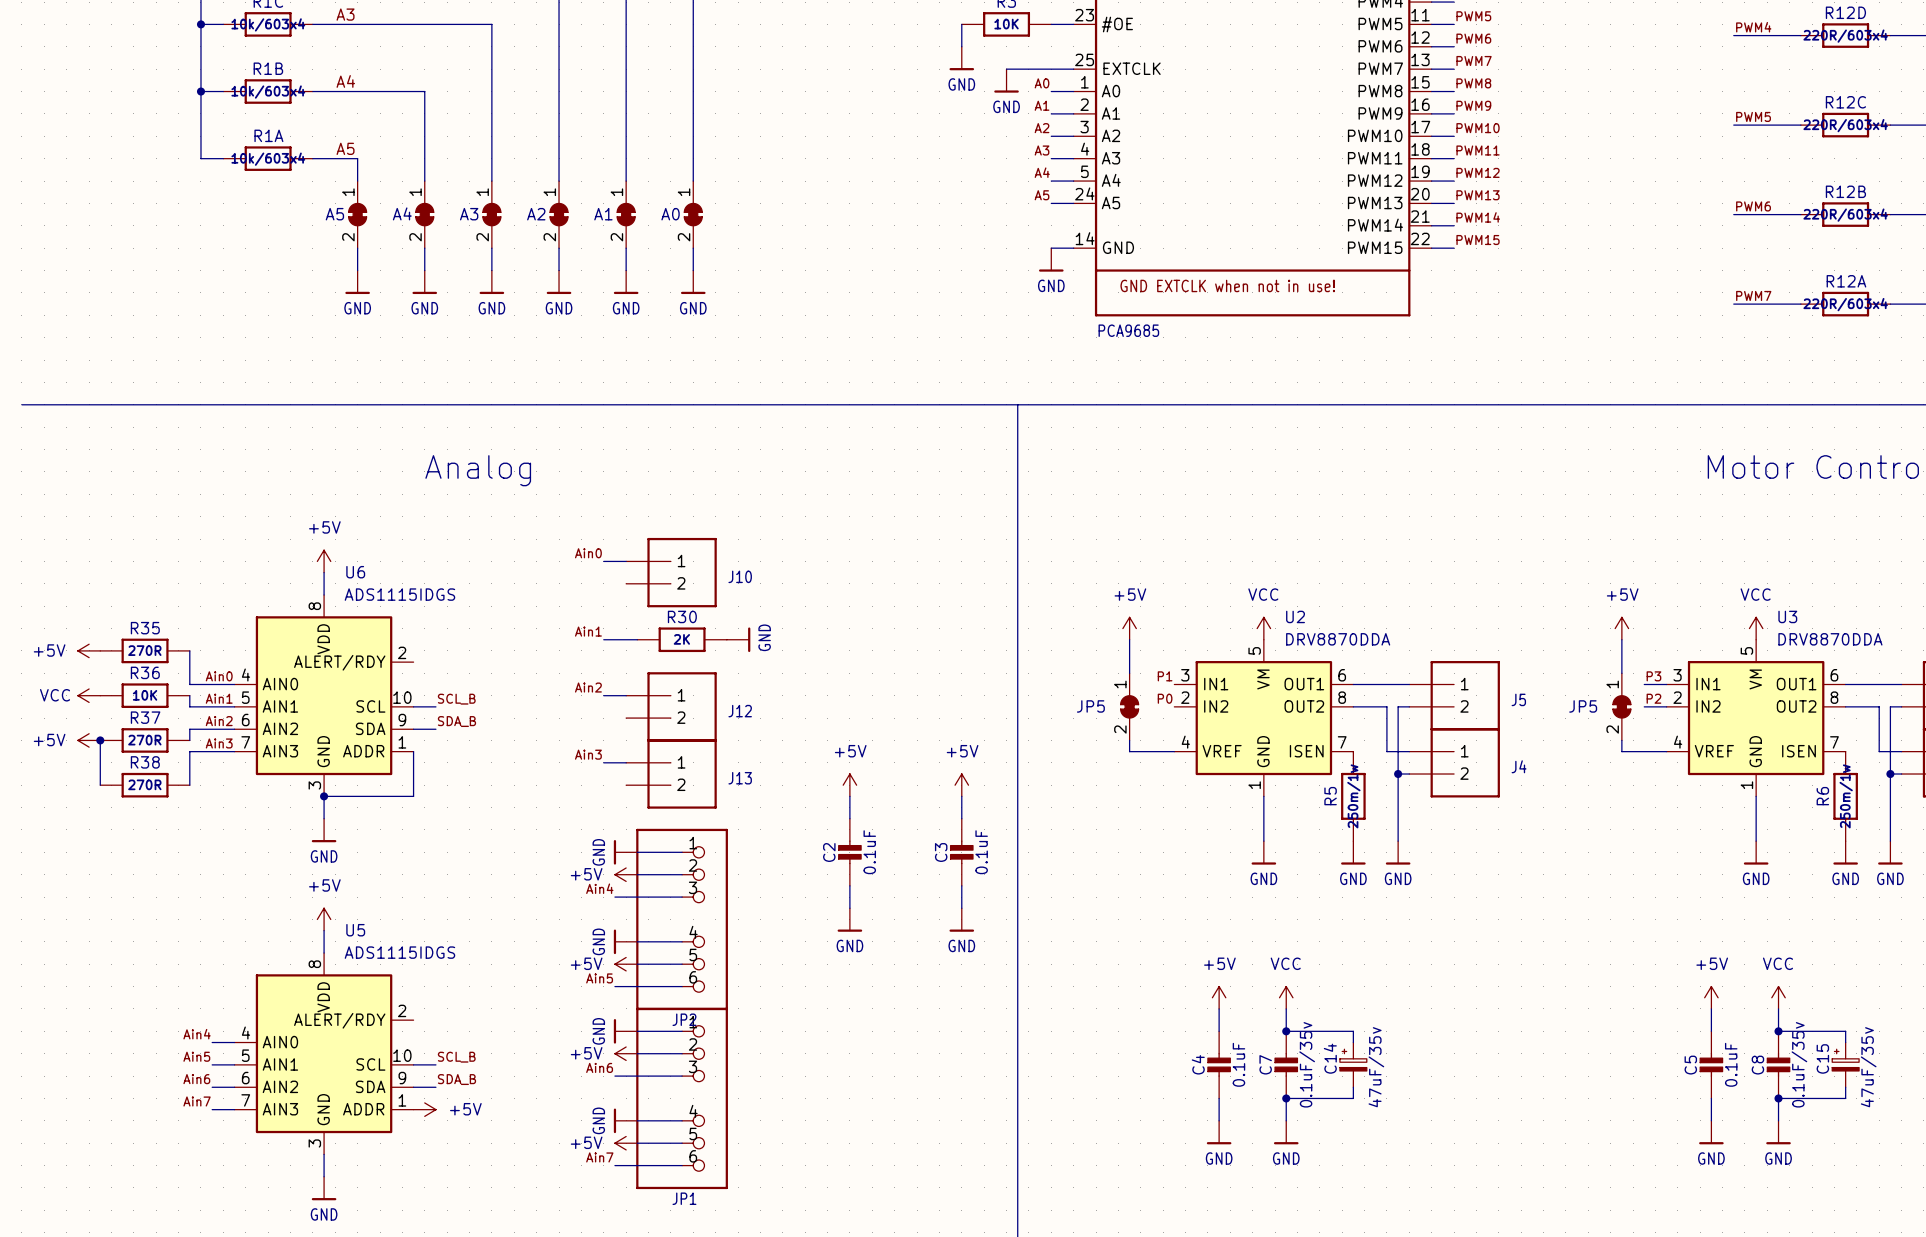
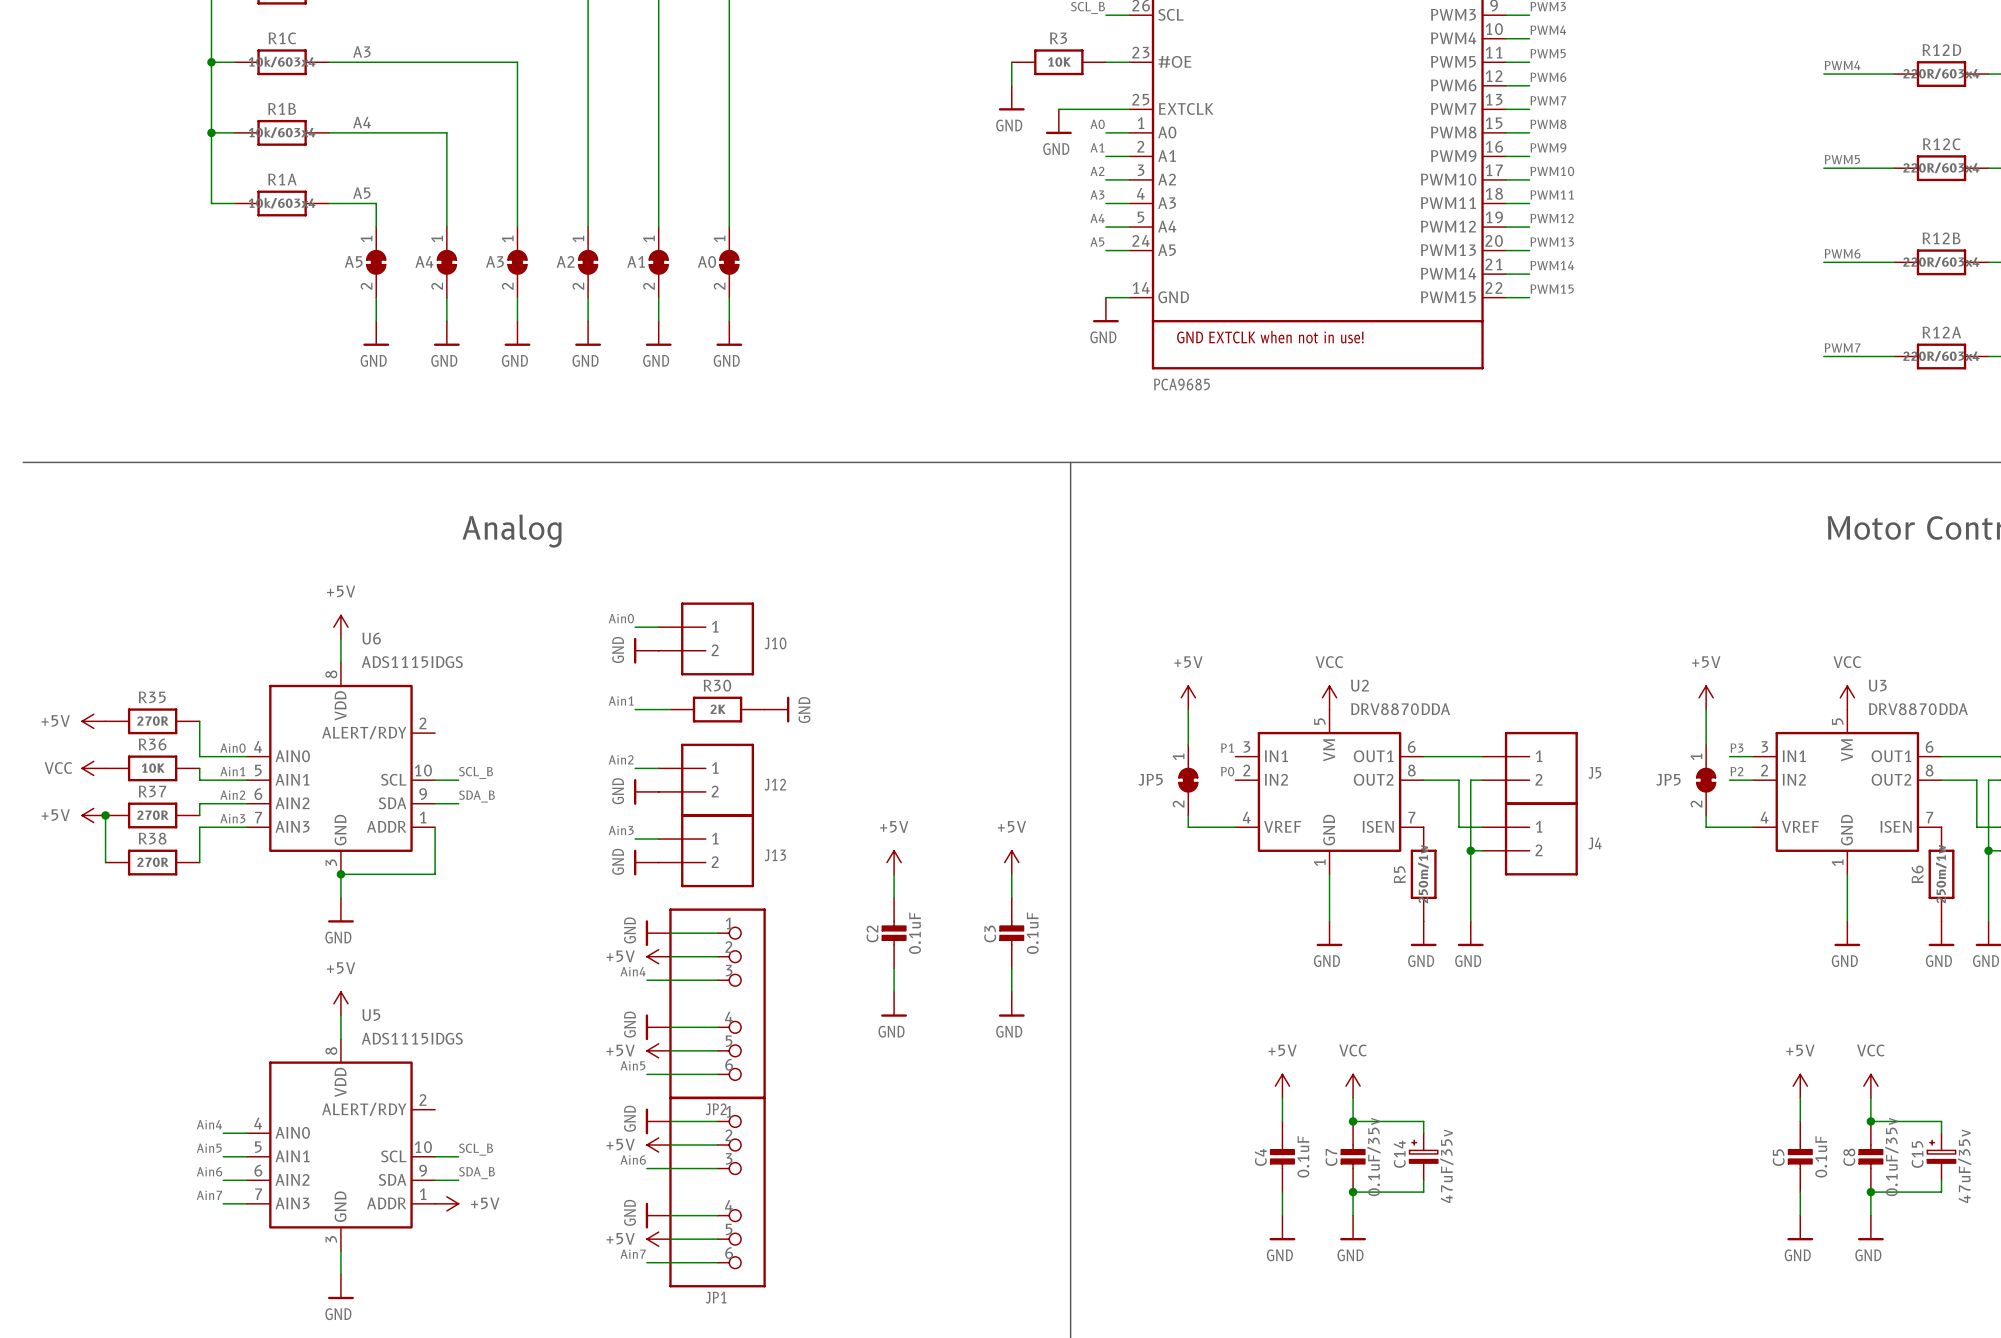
power symbol: none -> GND (646, 650)
power symbol: none -> GND (646, 791)
power symbol: none -> GND (646, 862)

